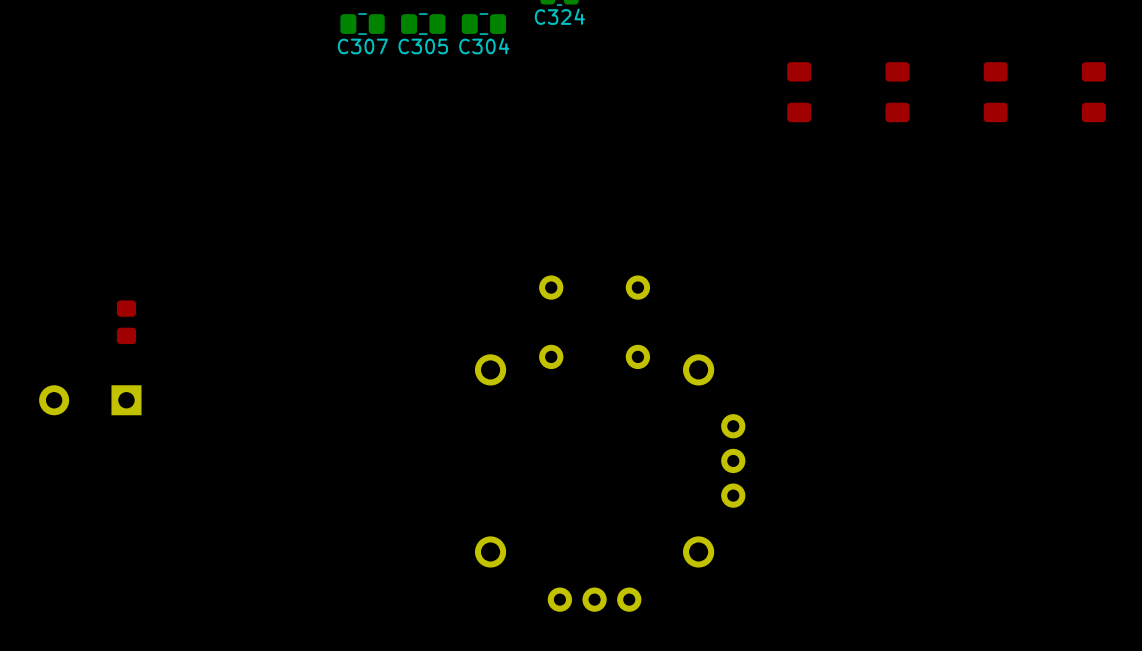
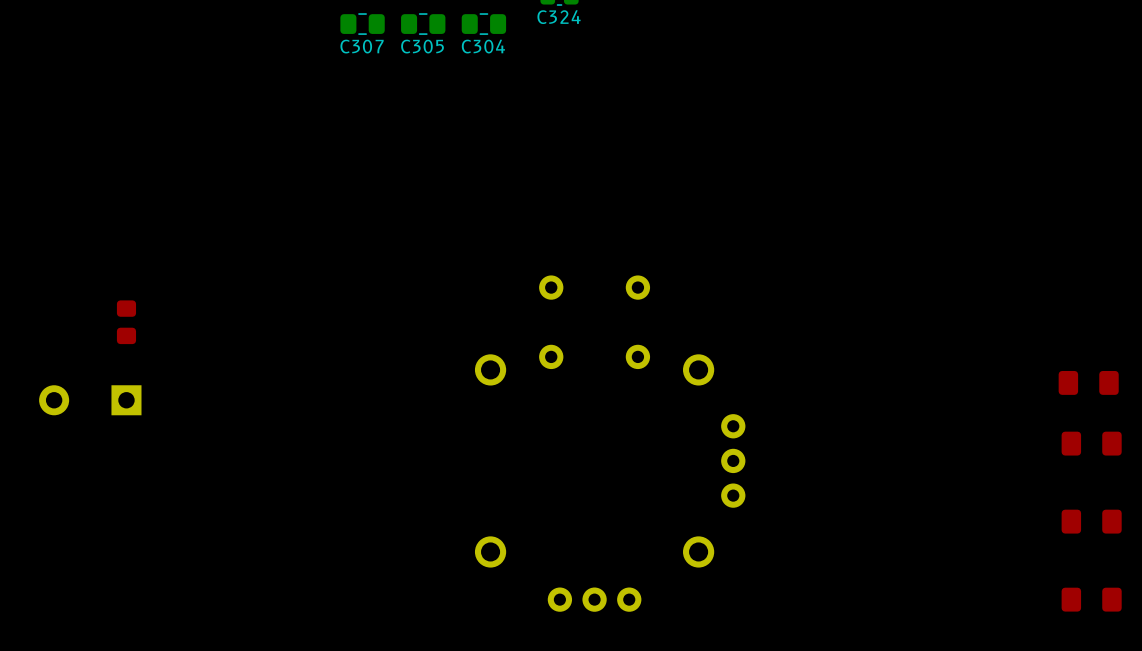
part: (799, 92) -> none
part: (897, 92) -> none
part: (995, 92) -> none
part: (1093, 92) -> none
part: none -> (1088, 382)
part: none -> (1091, 443)
part: none -> (1091, 521)
part: none -> (1091, 599)

